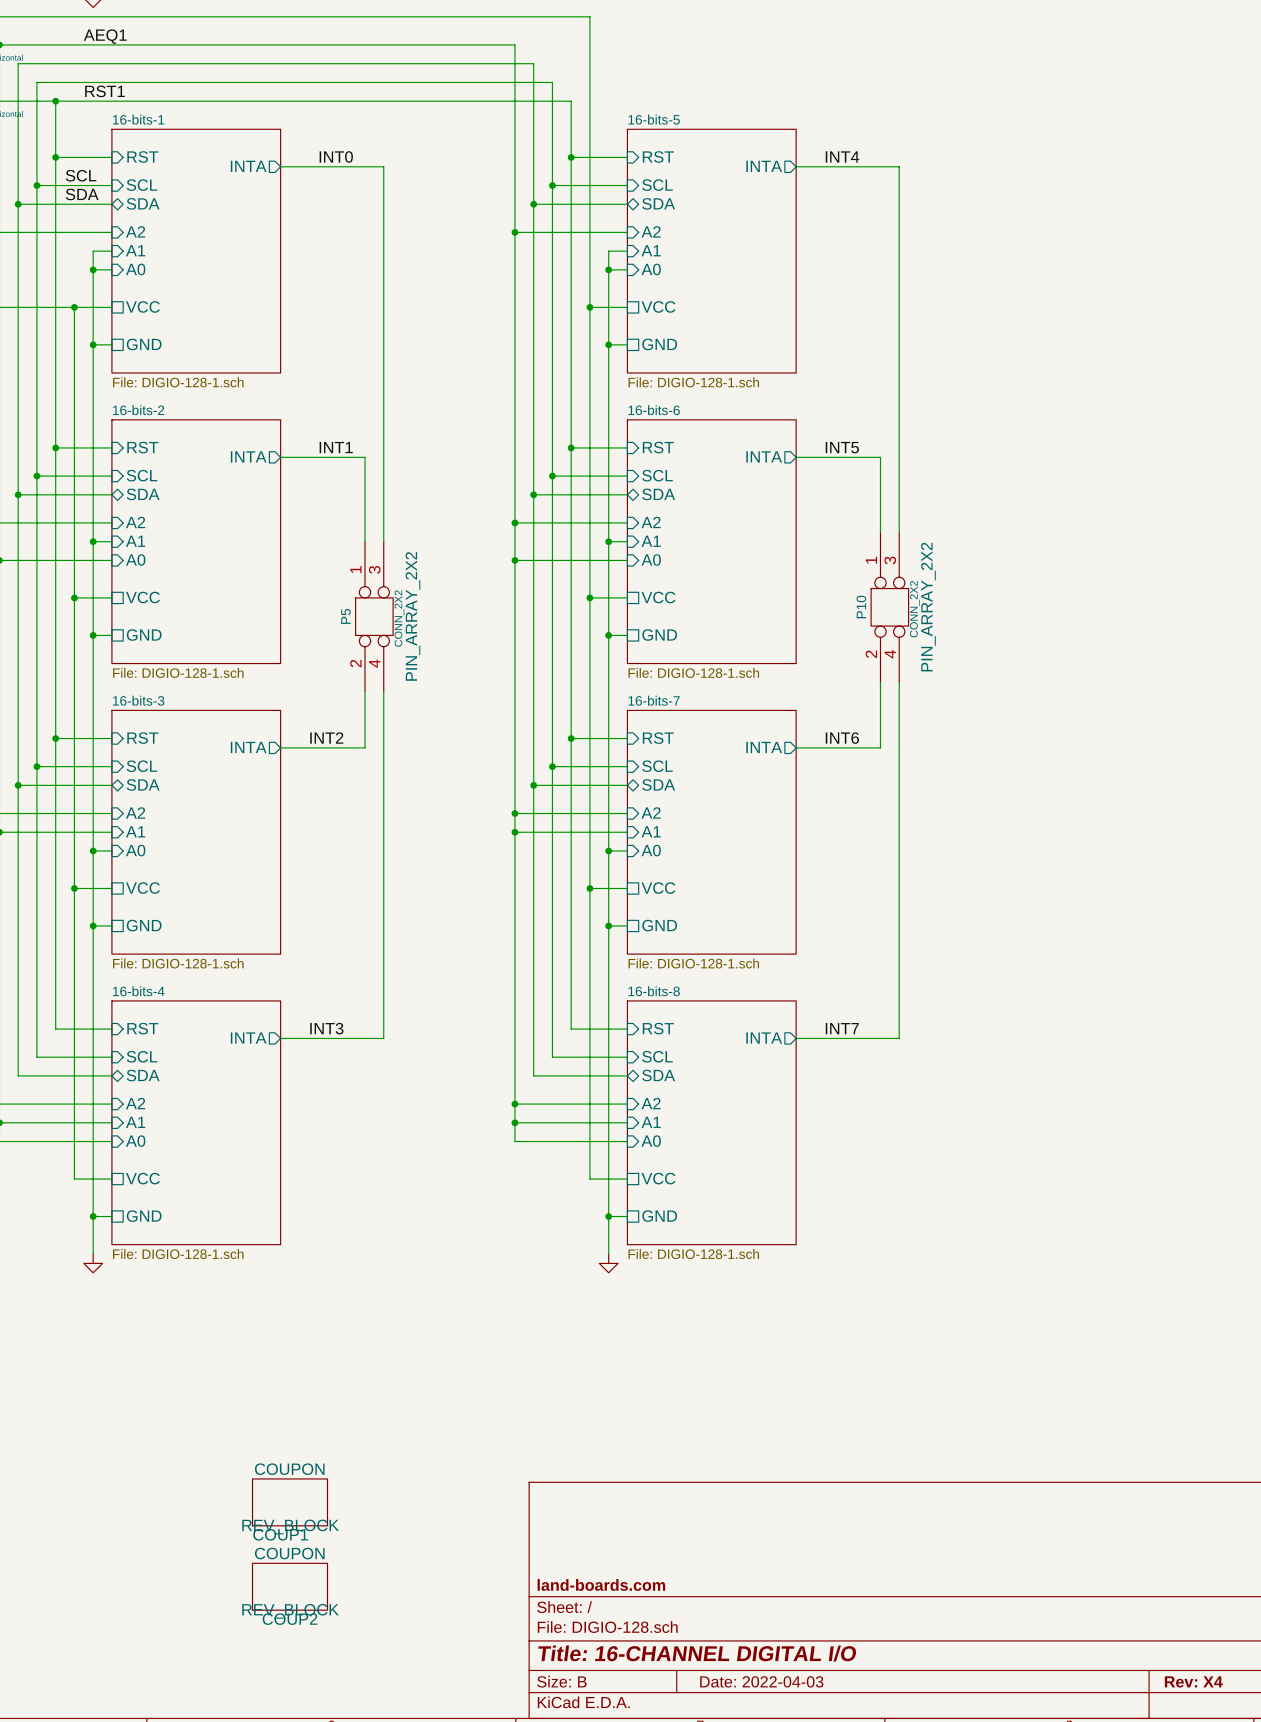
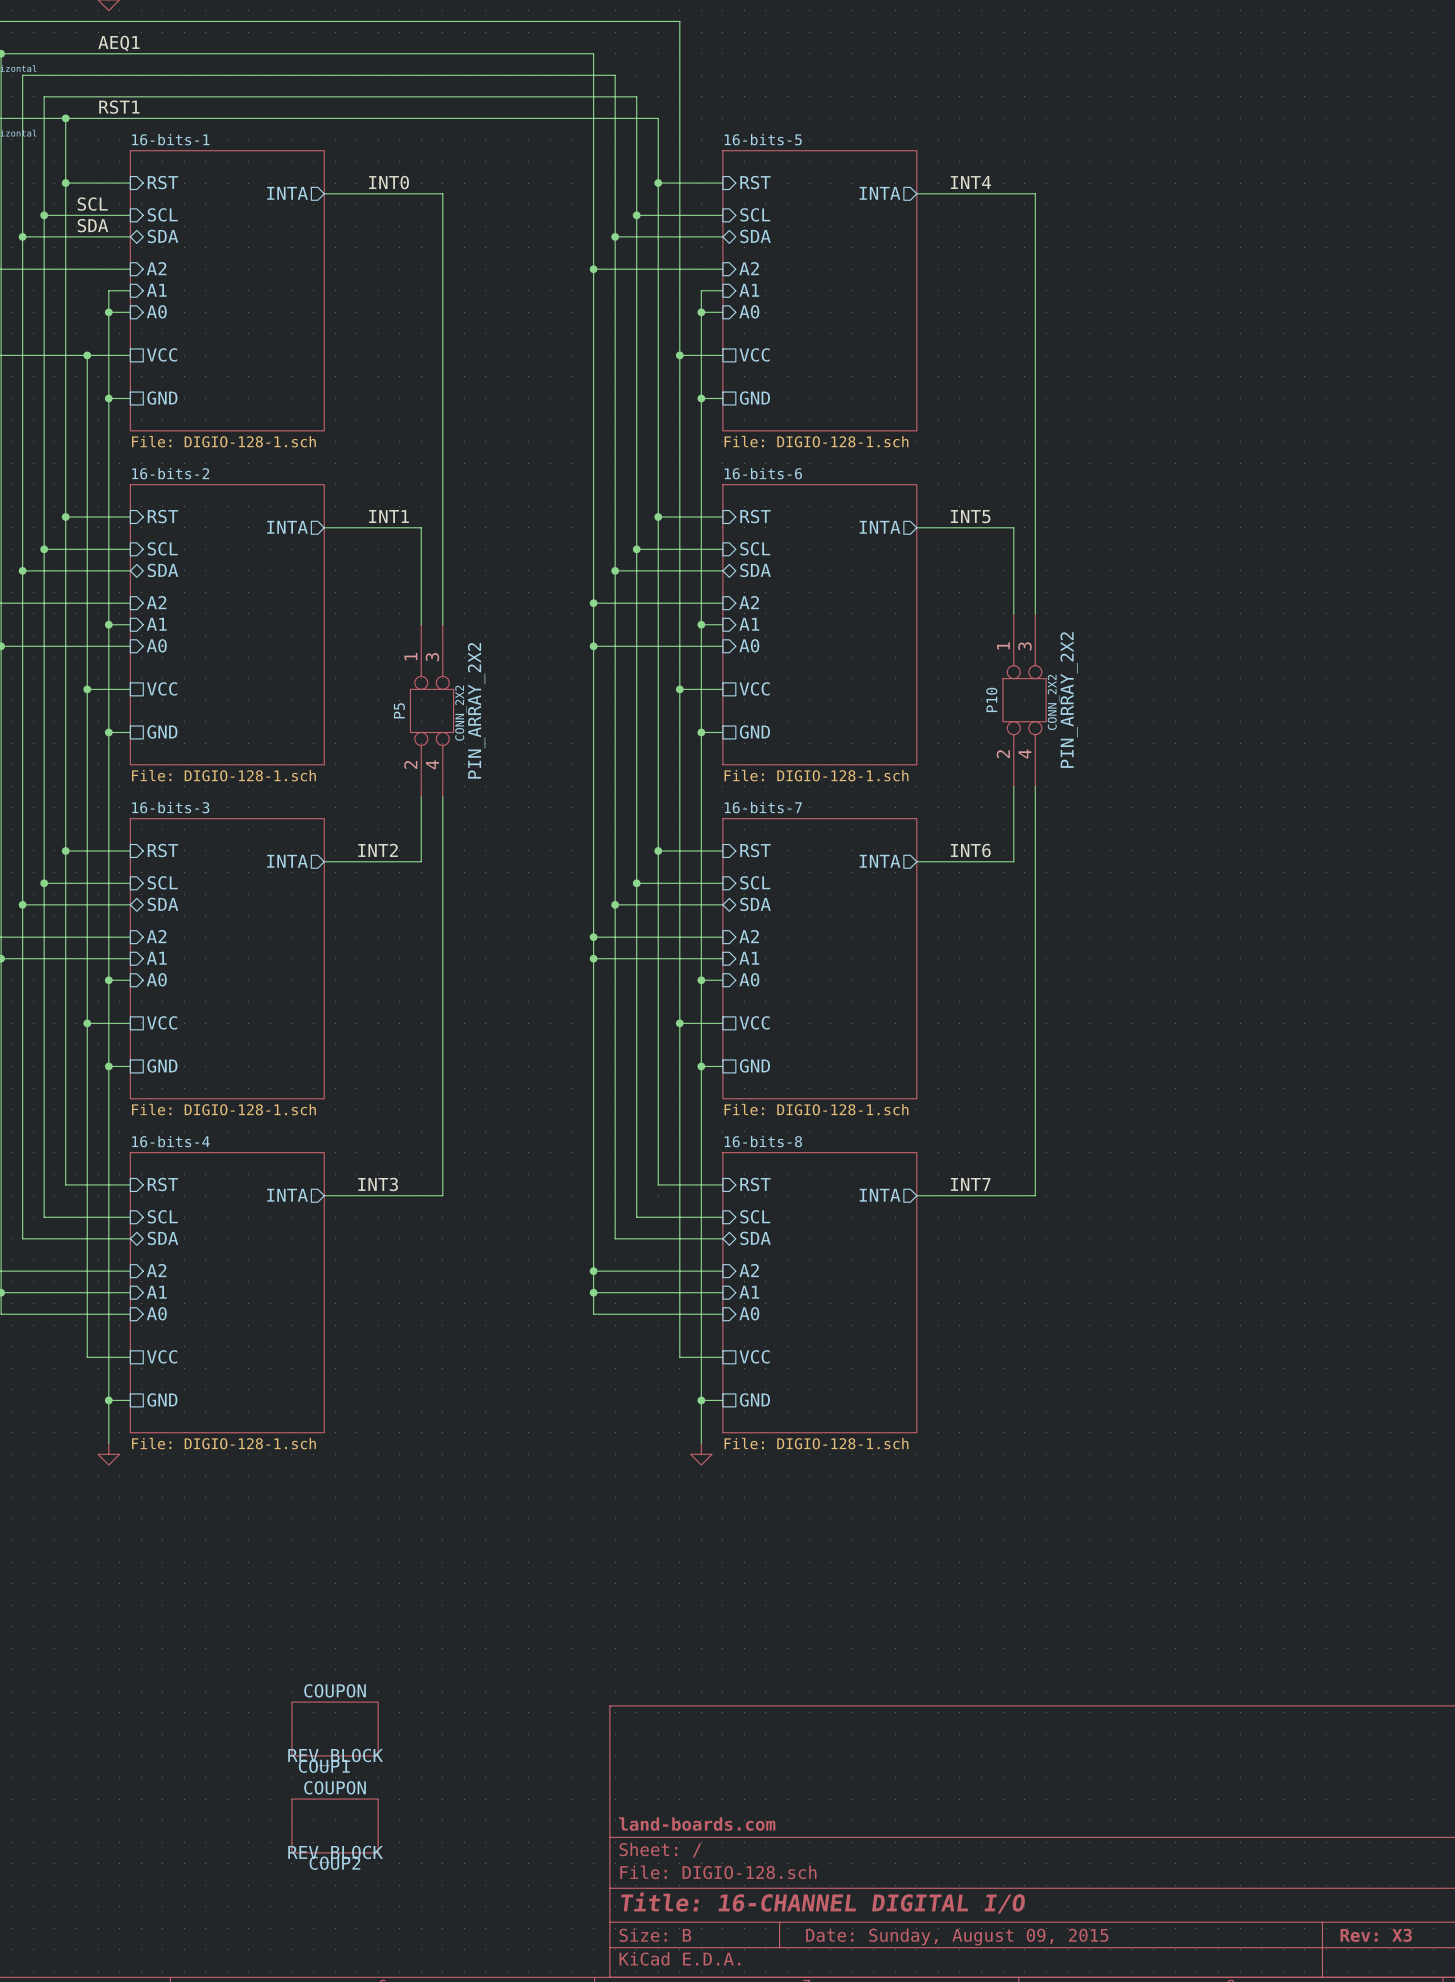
title block: Date: 2022-04-03 (761, 1681) -> Date: Sunday, August 09, 2015 (957, 1936)
title block: Rev: X4 (1193, 1681) -> Rev: X3 (1376, 1935)

